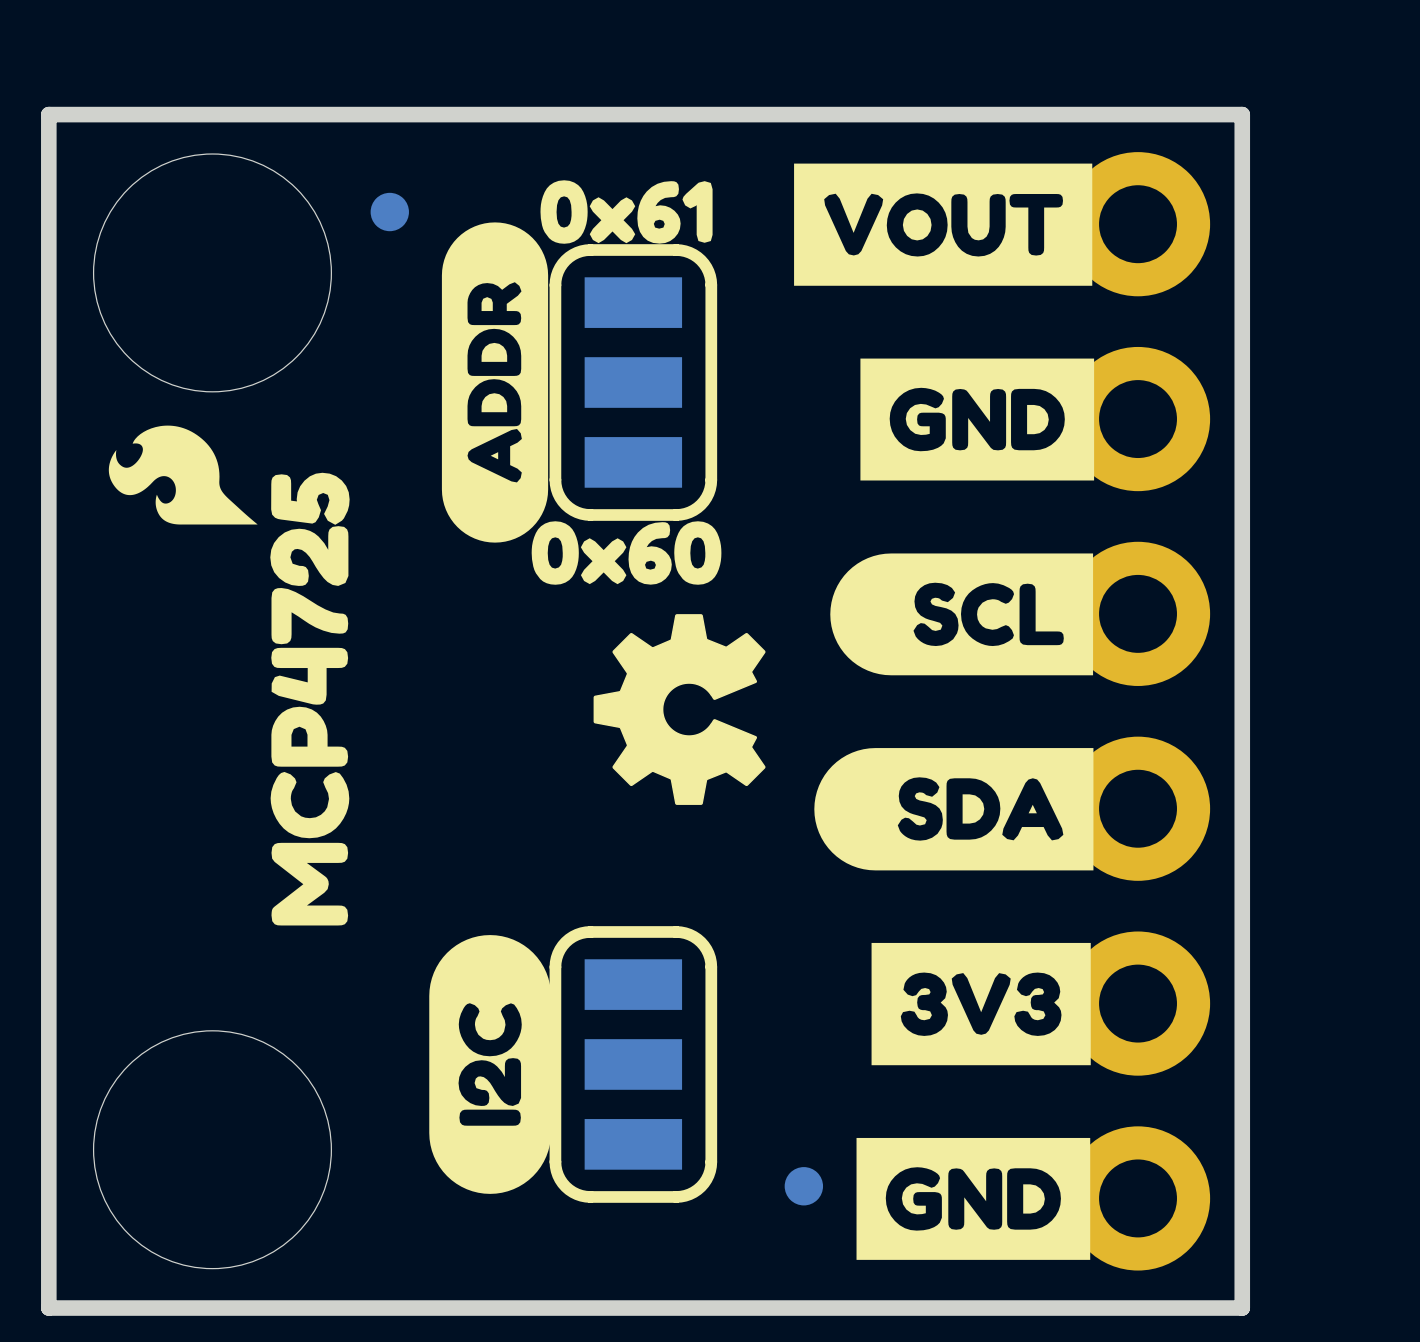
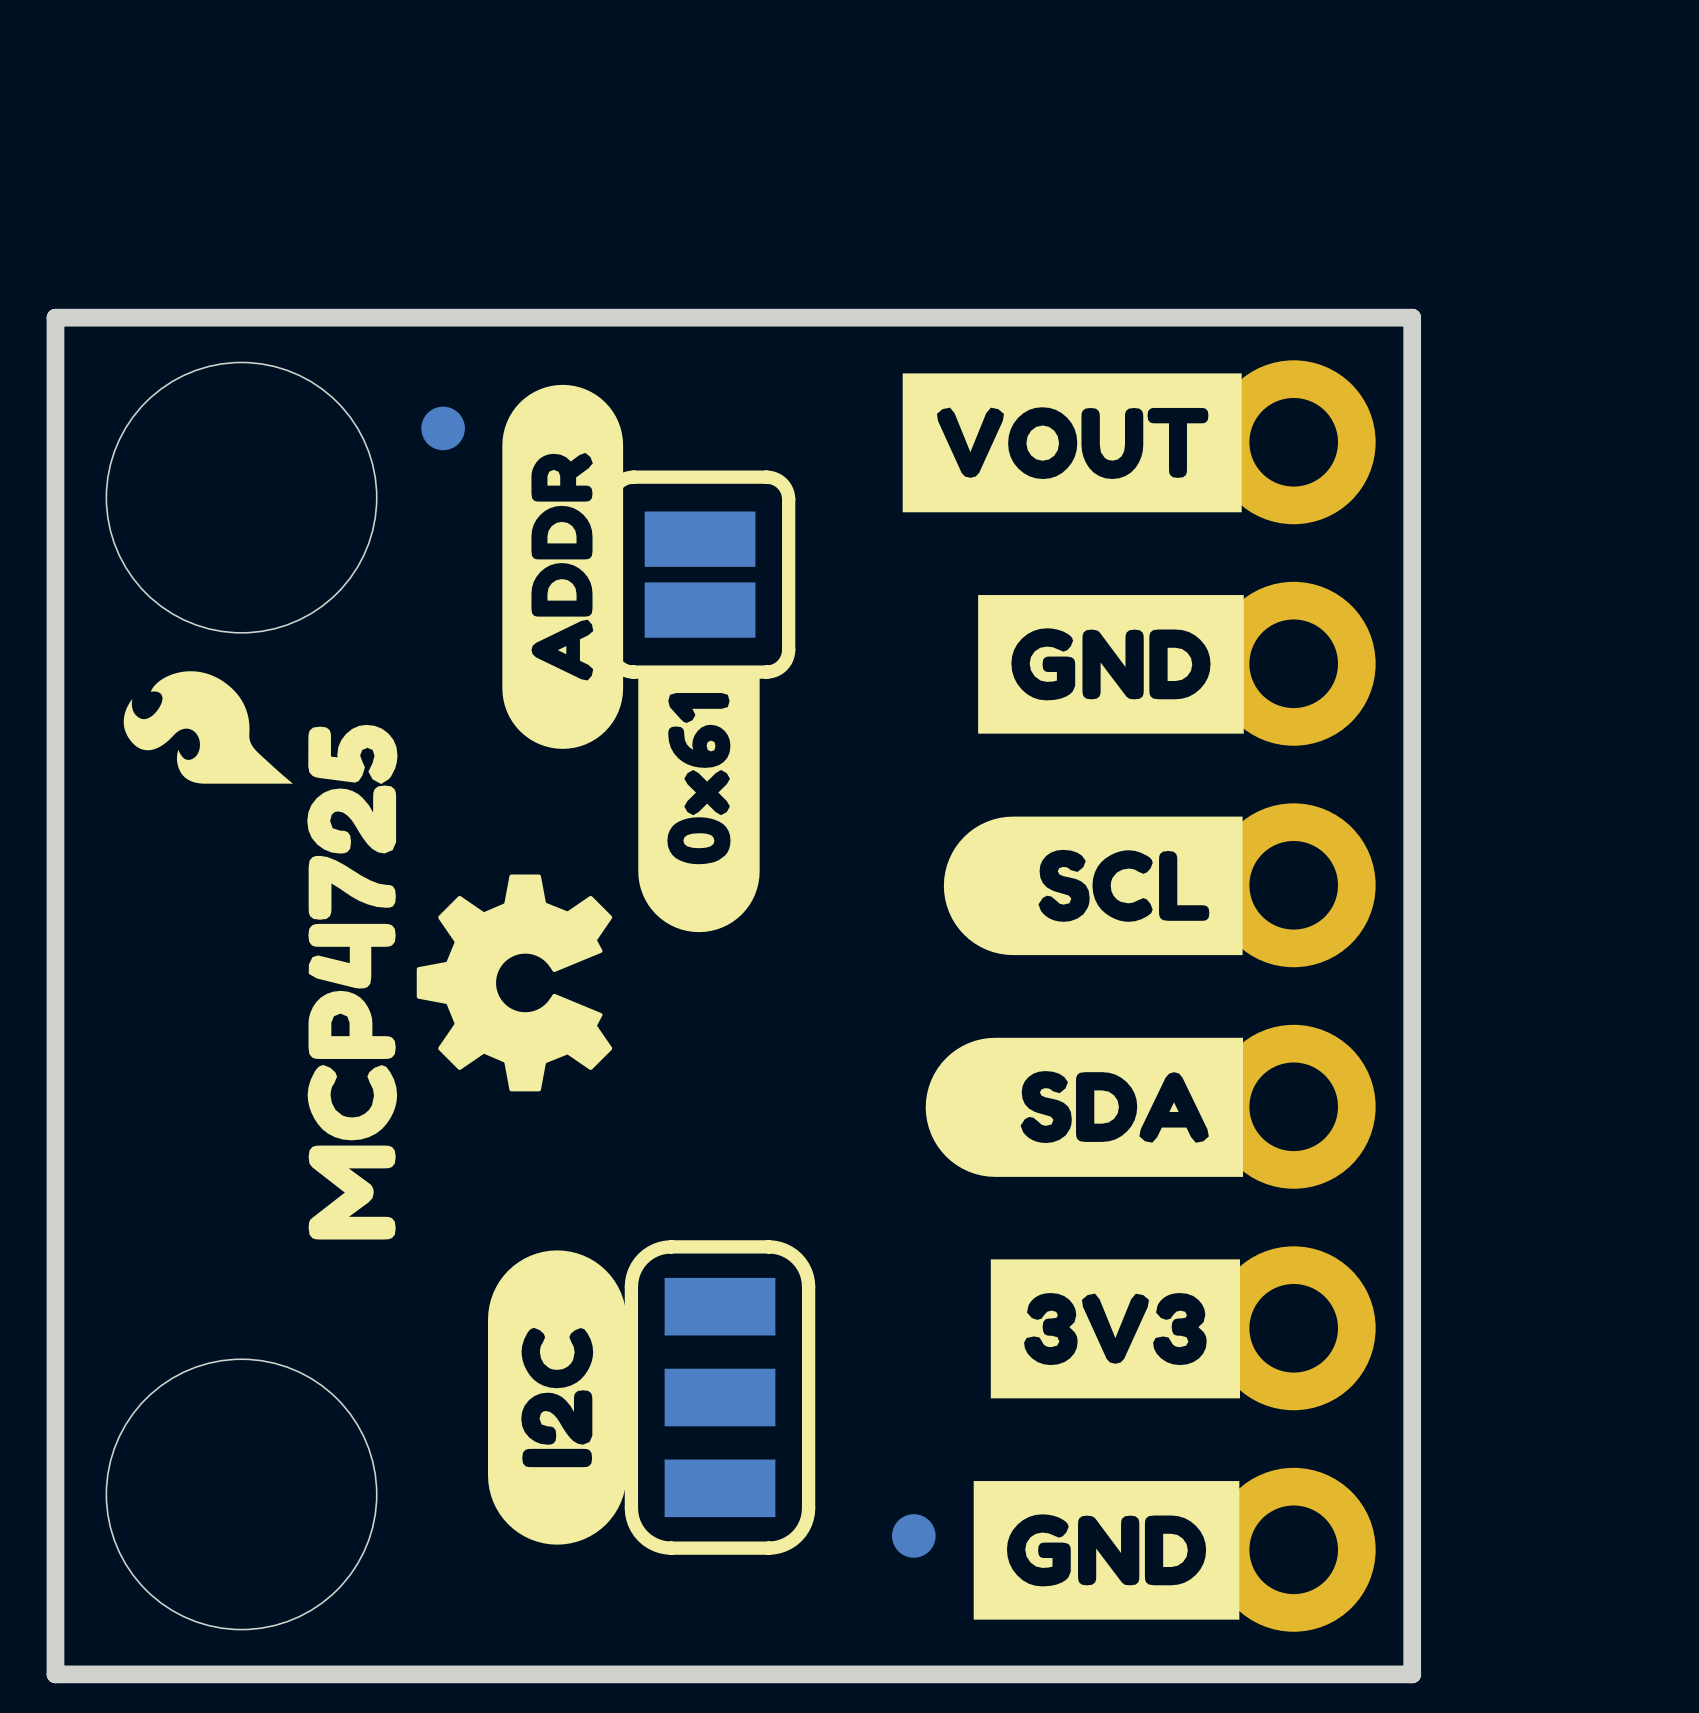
drawing: [540, 180, 713, 244] -> none
part footprint: [549, 244, 718, 521] -> [604, 470, 796, 679]
drawing position: (495, 382) -> (562, 566)
drawing shape: [531, 521, 722, 585] -> [638, 671, 760, 933]
drawing position: (679, 709) -> (514, 982)

